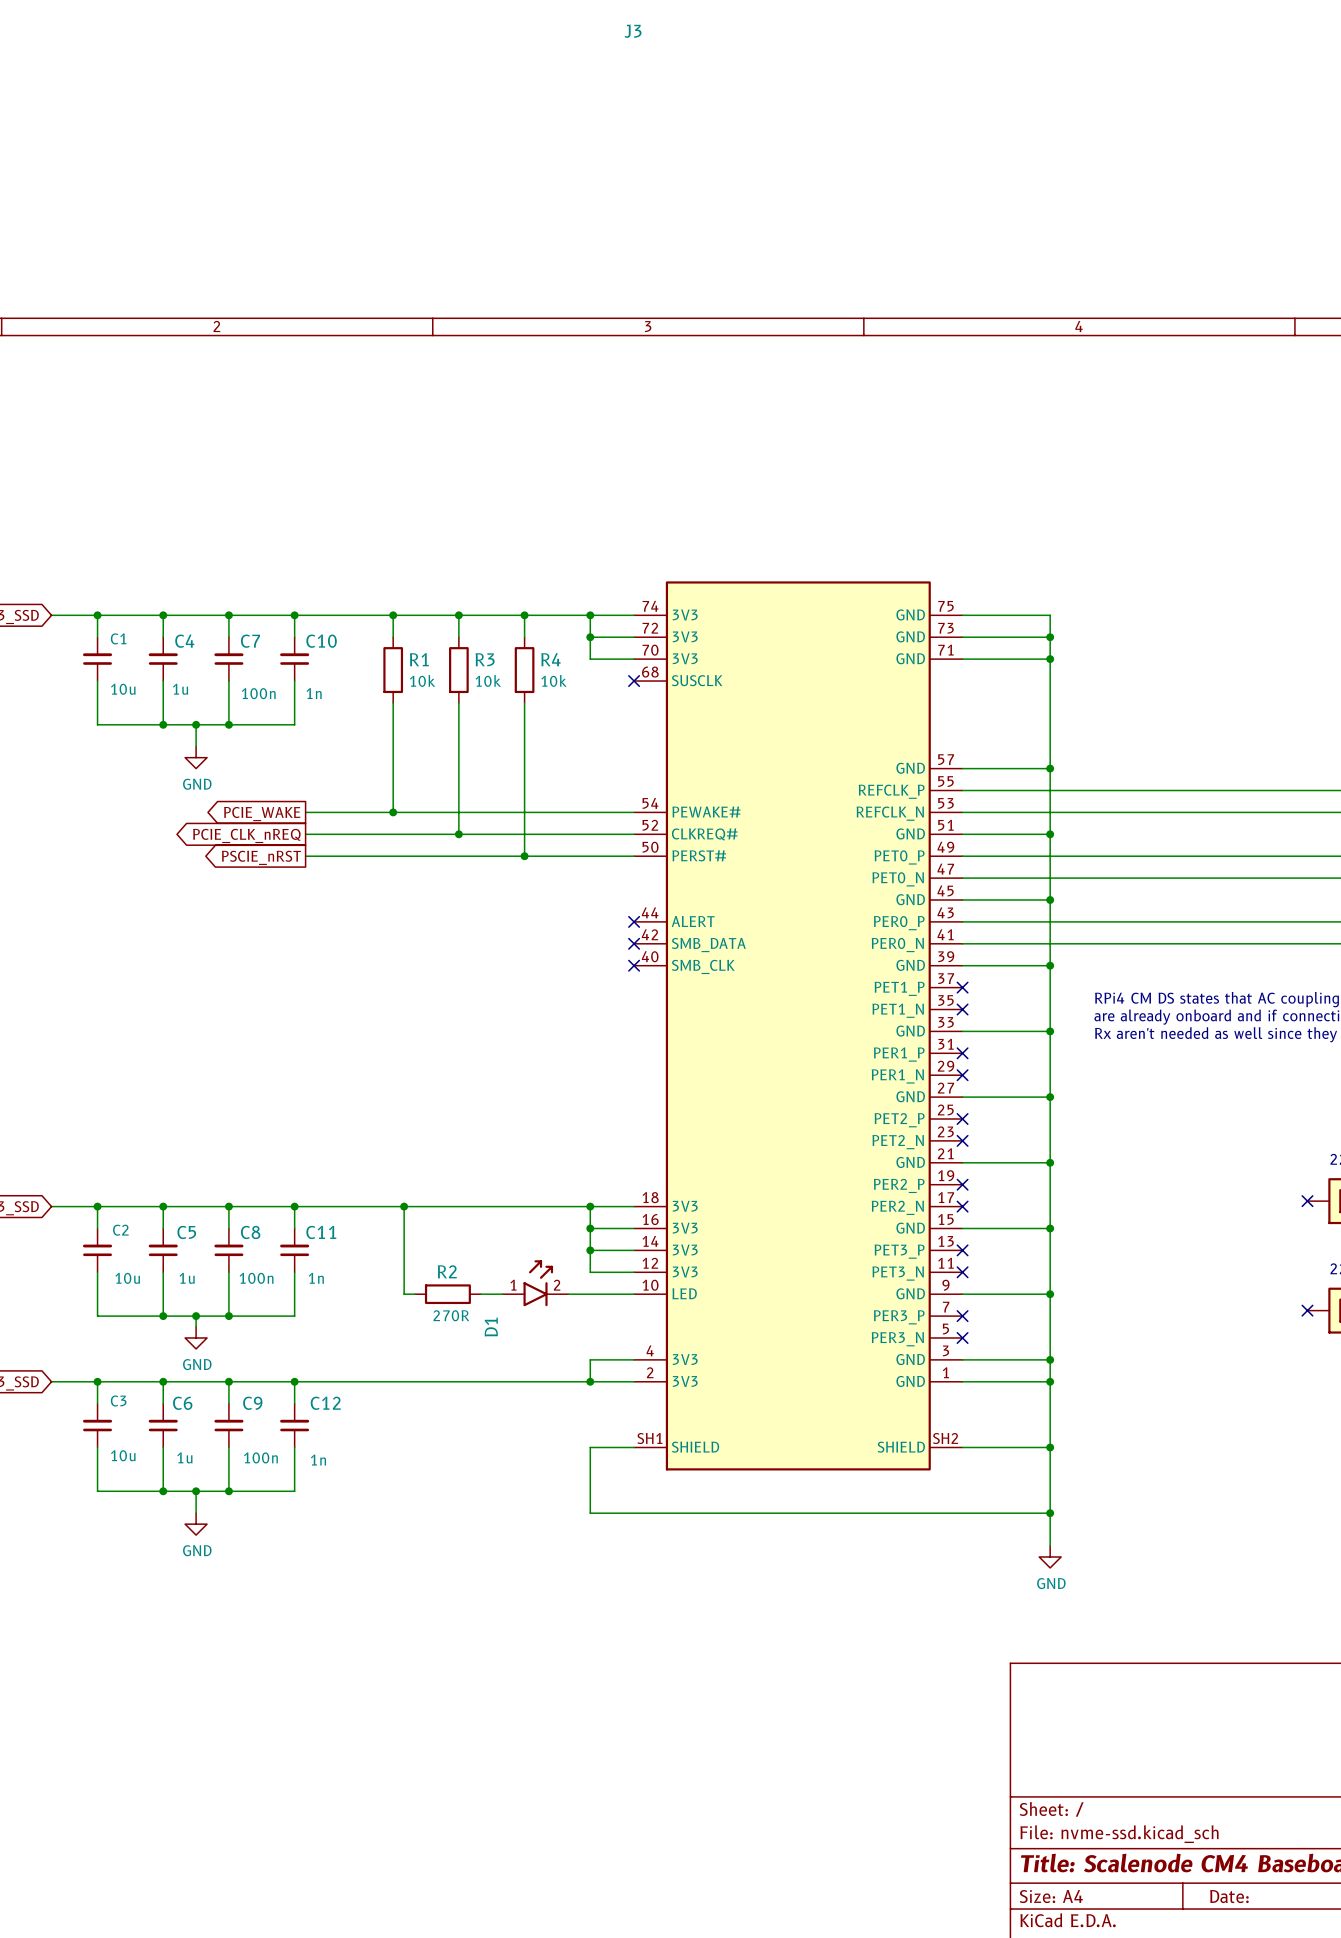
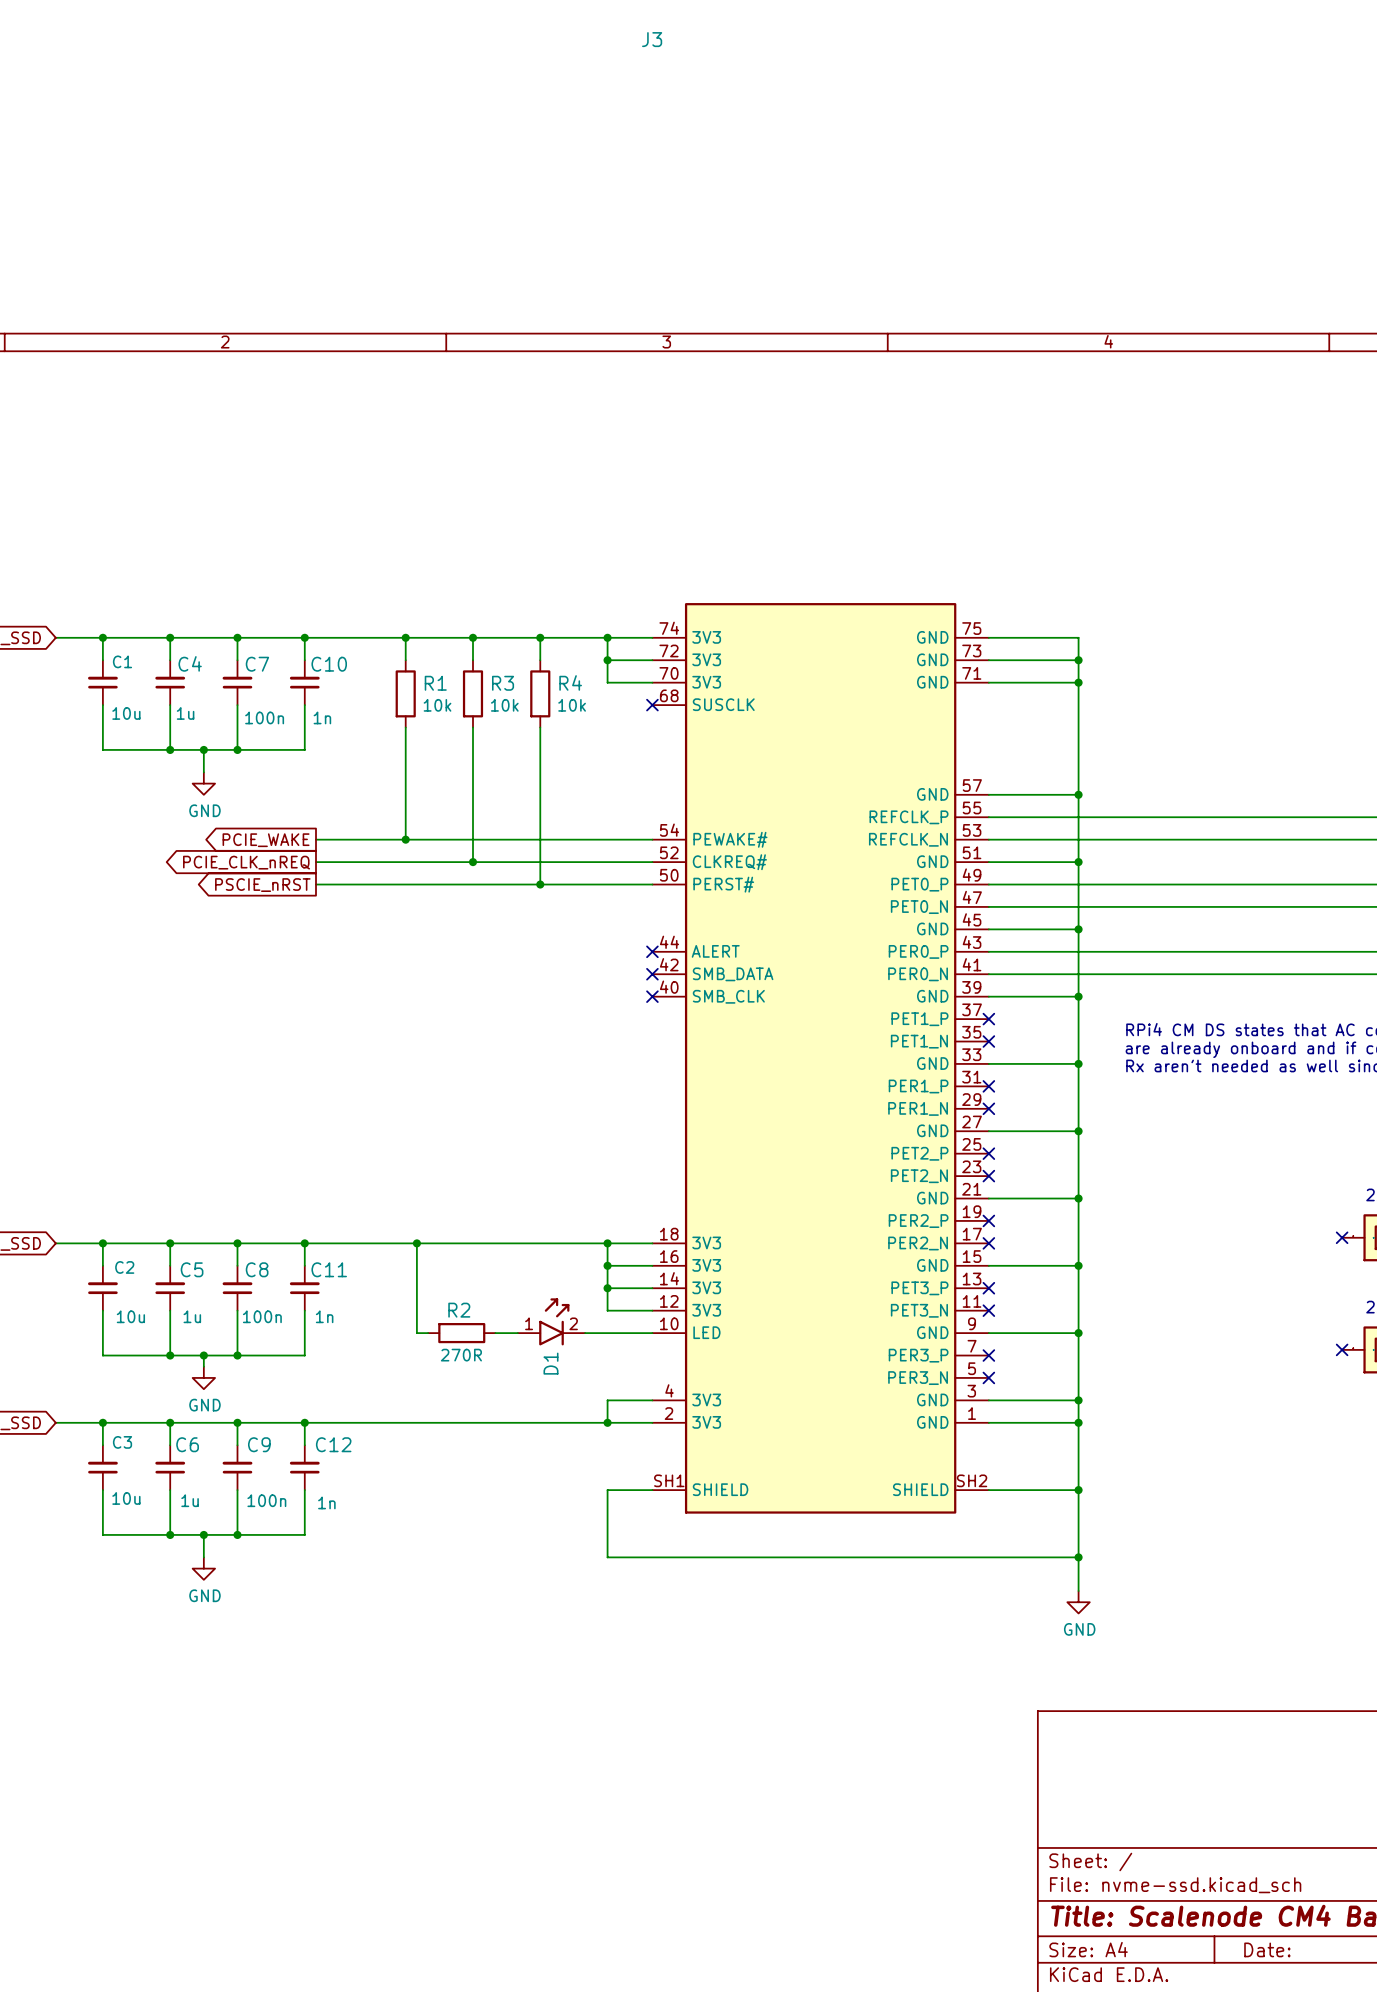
D1 name position: D1 (491, 1327) -> D1 (550, 1363)

